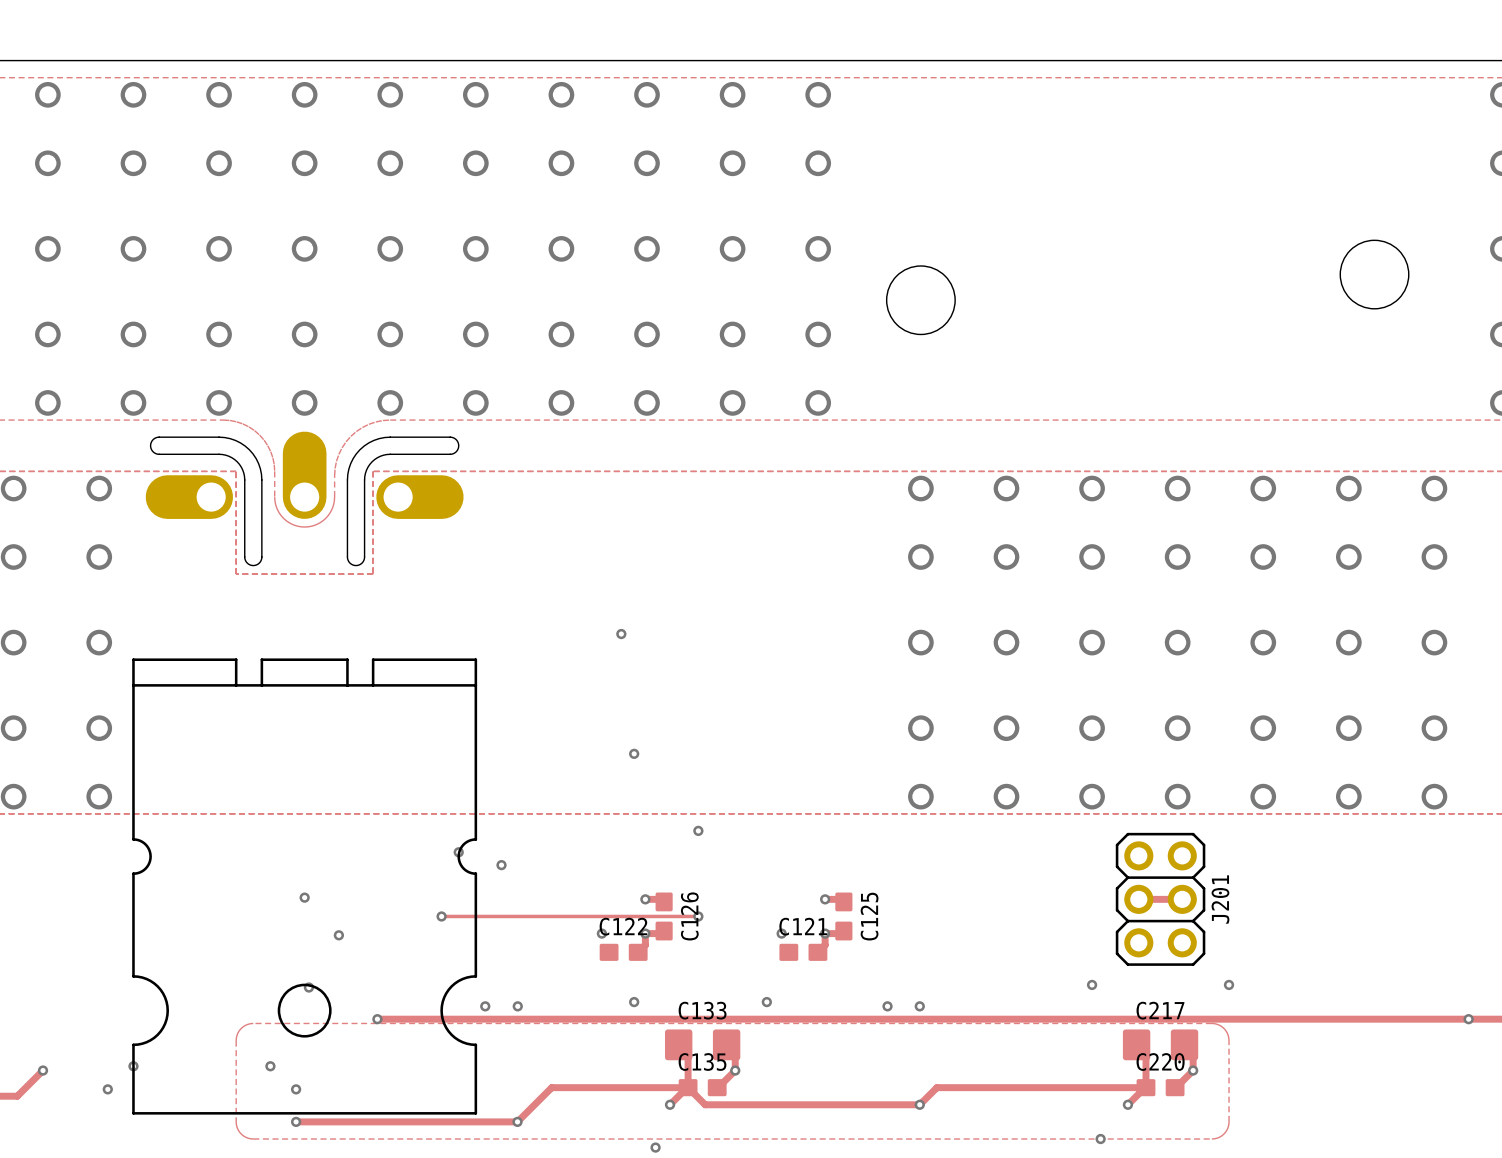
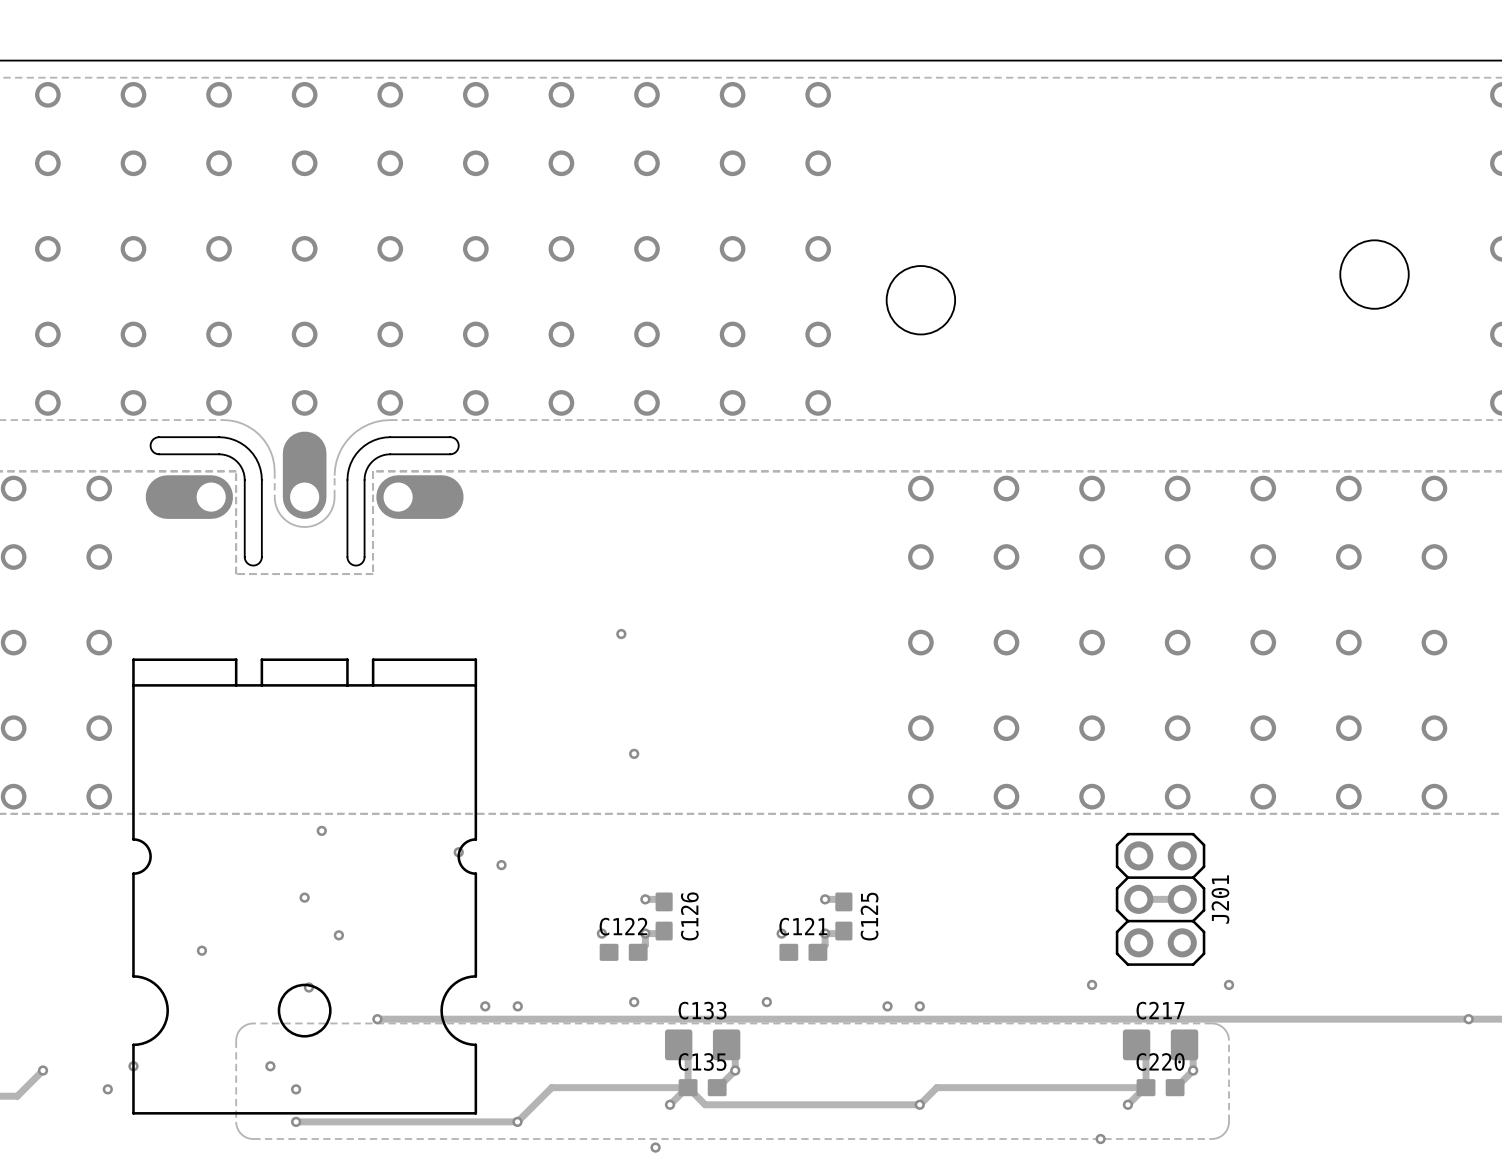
via: none -> (321, 830)
via: (698, 830) -> none
track: (441, 916) (698, 916) -> none
via: (441, 916) -> none
via: (698, 916) -> none
via: none -> (201, 950)

